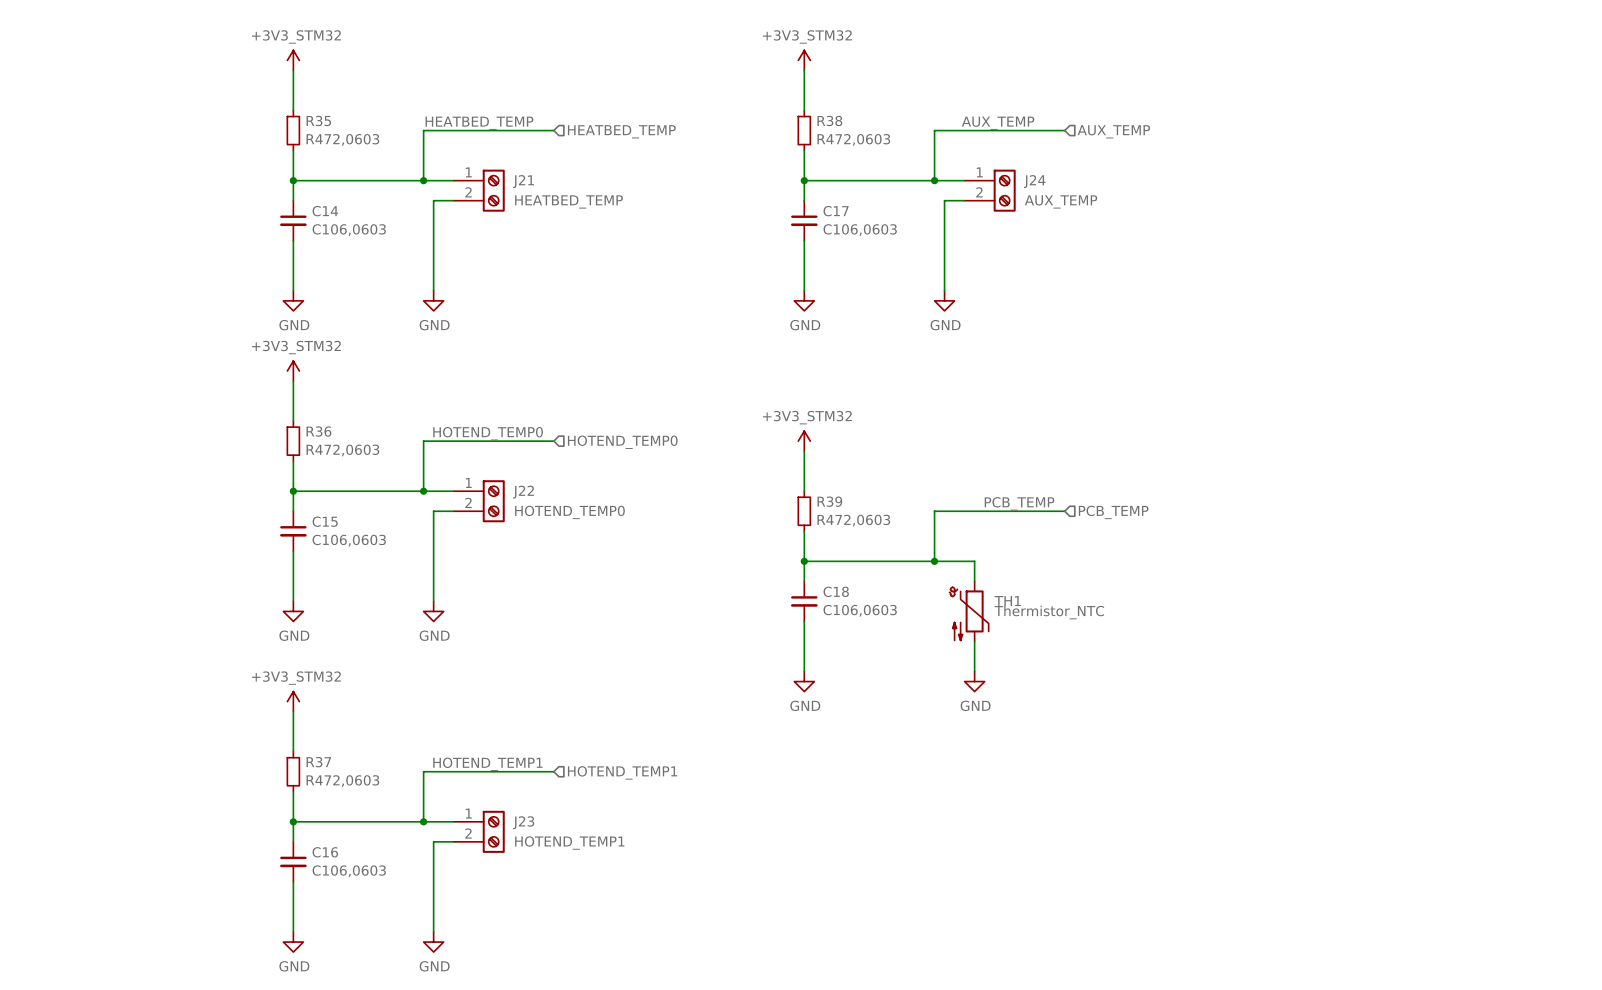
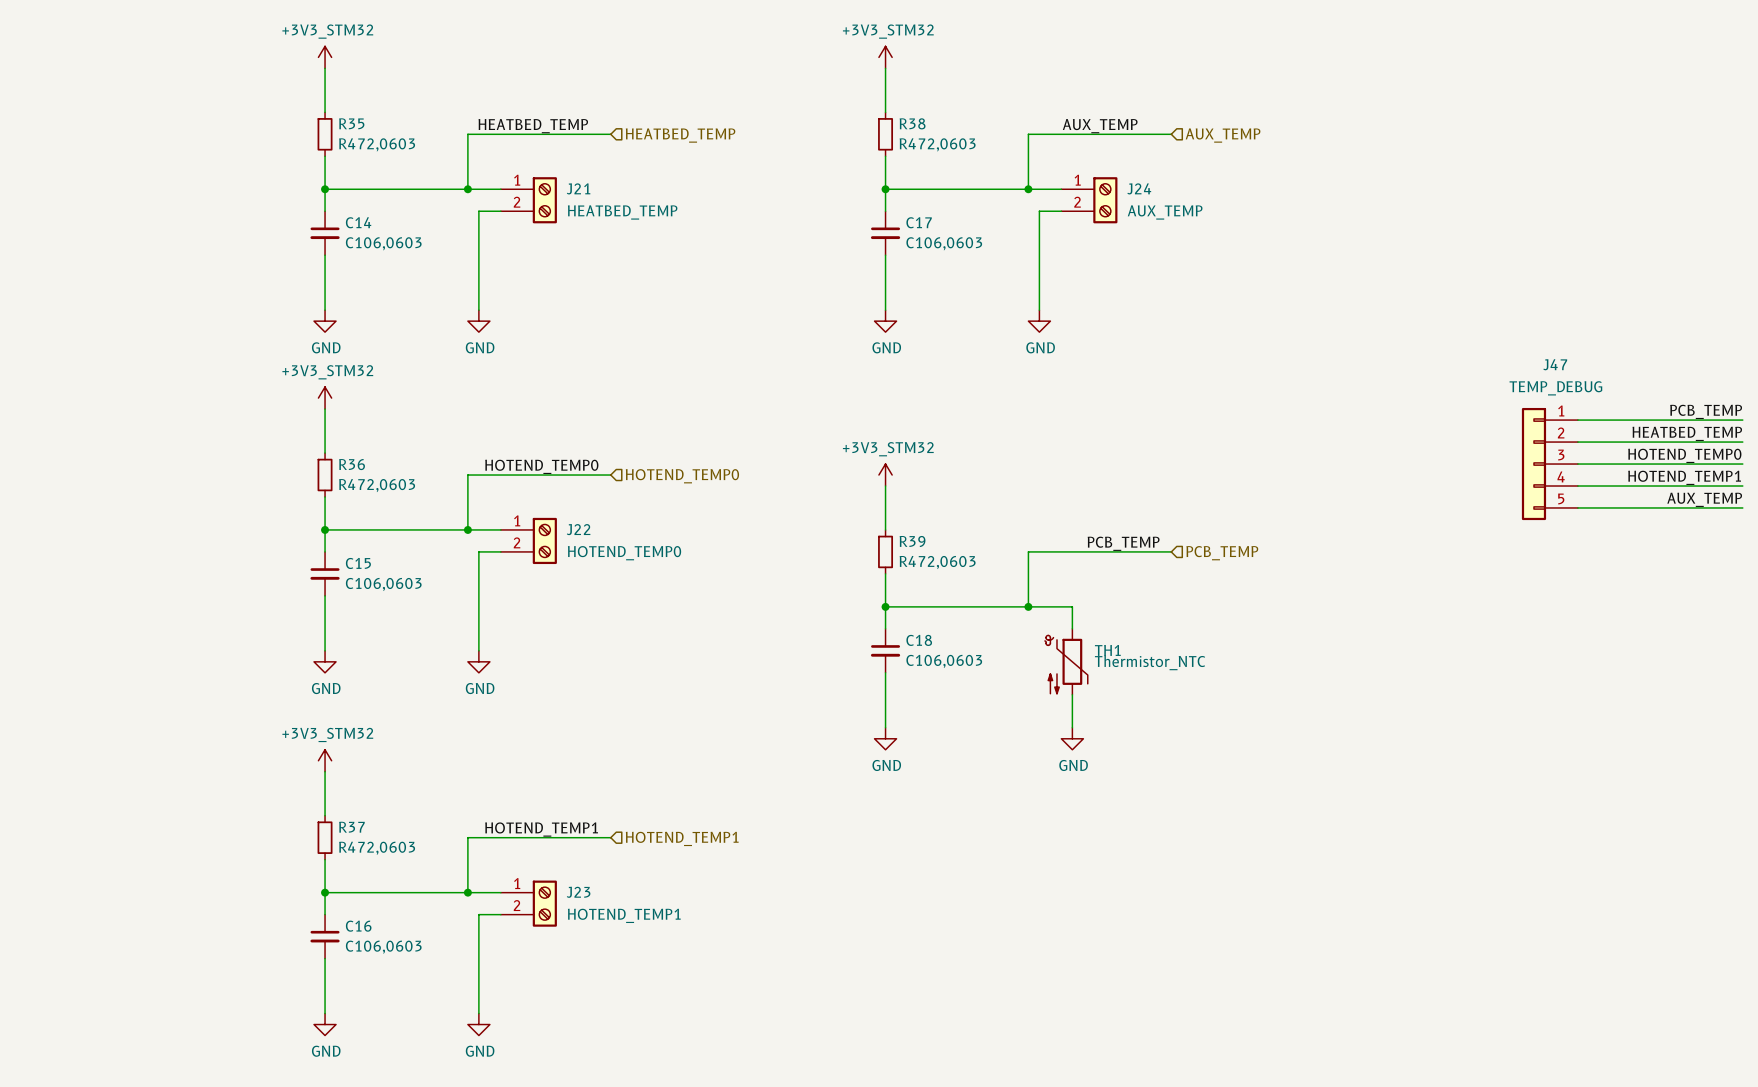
label: none -> PCB_TEMP (1706, 411)
wire: none -> (1577, 420) (1742, 420)
label: none -> HEATBED_TEMP (1687, 433)
wire: none -> (1577, 442) (1742, 442)
label: none -> HOTEND_TEMP0 (1684, 455)
J47: none -> TEMP_DEBUG (1549, 464)
wire: none -> (1577, 464) (1742, 464)
label: none -> HOTEND_TEMP1 (1684, 477)
wire: none -> (1577, 486) (1742, 486)
label: none -> AUX_TEMP (1704, 499)
wire: none -> (1577, 507) (1742, 507)

